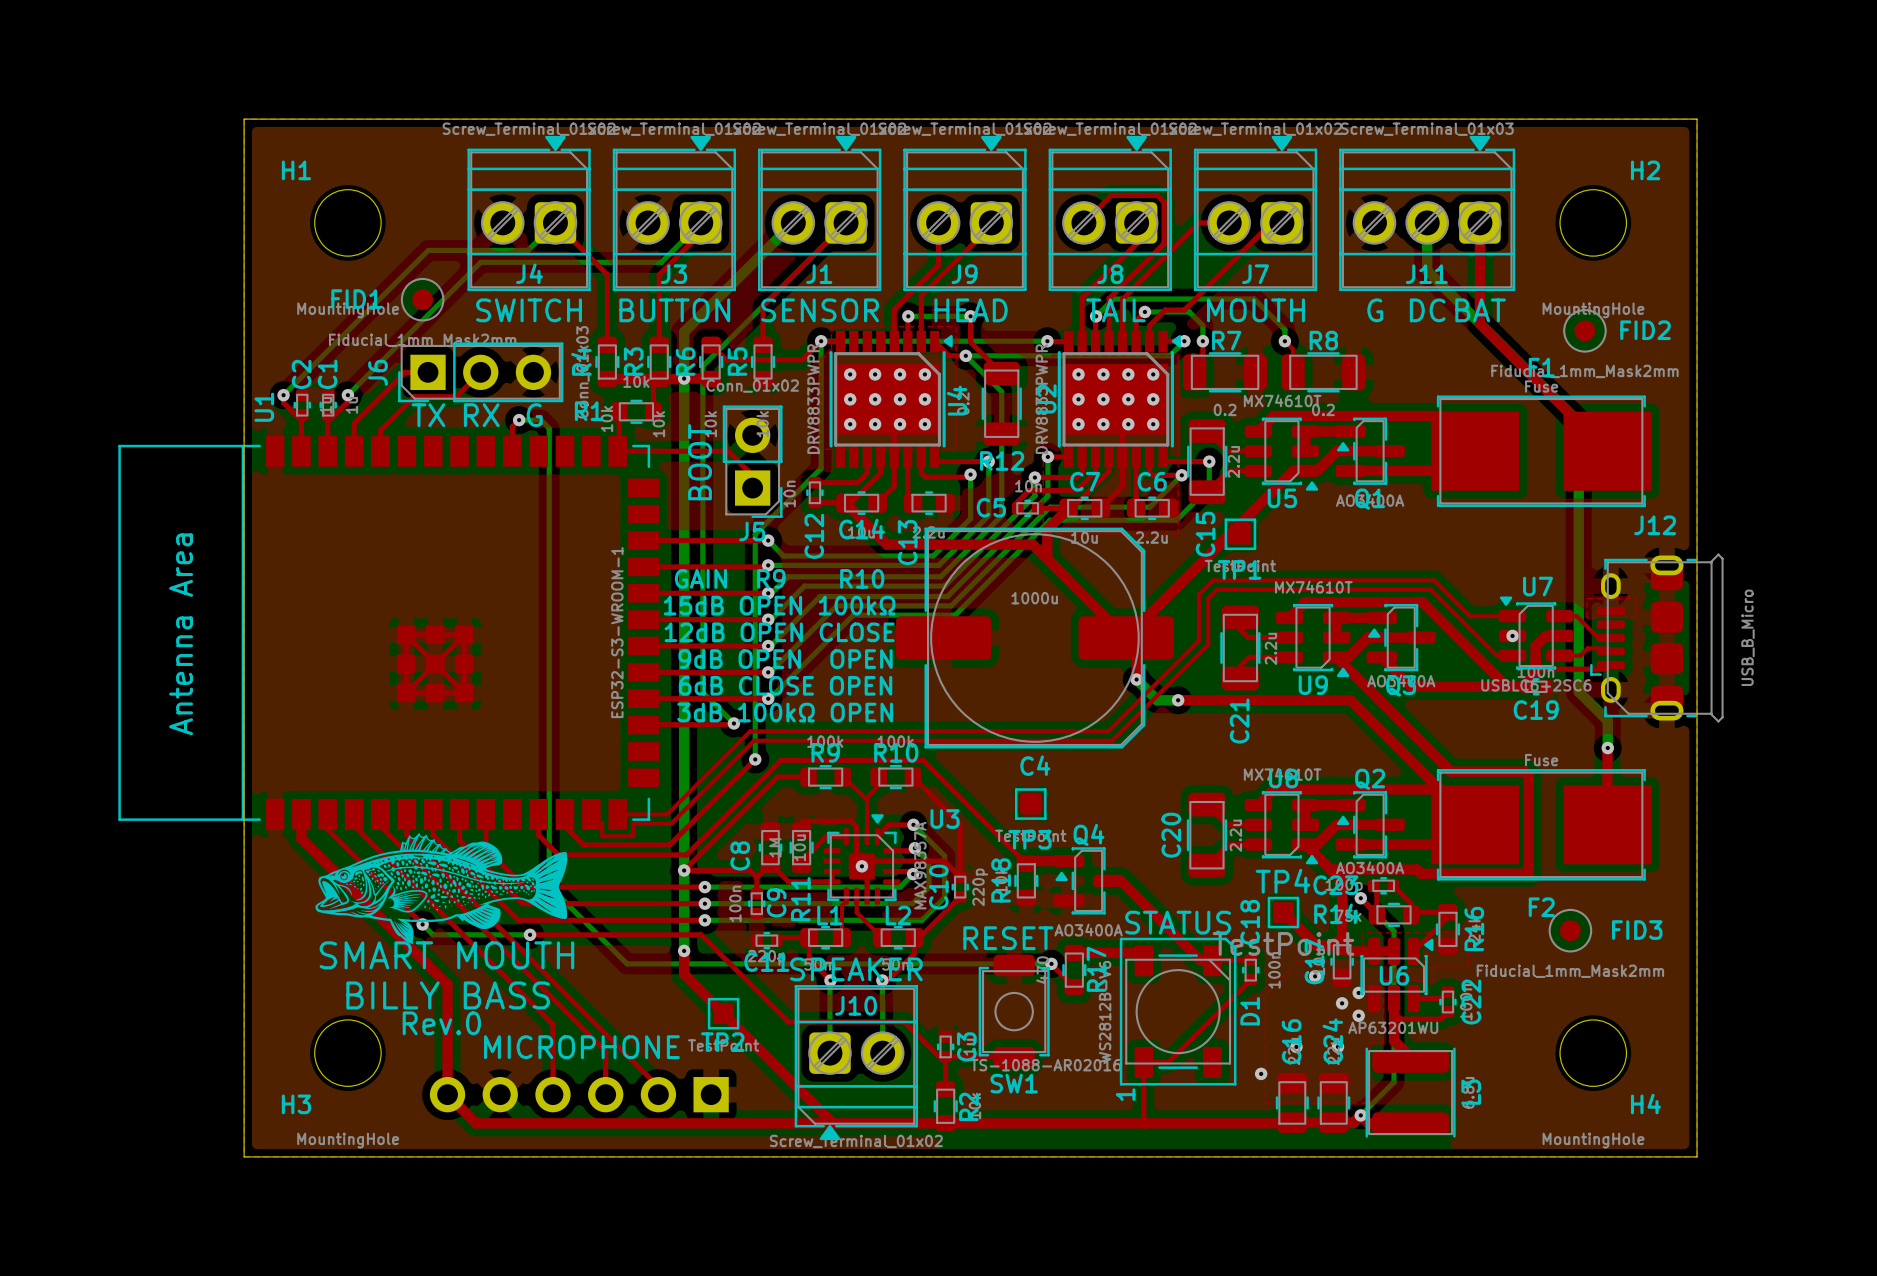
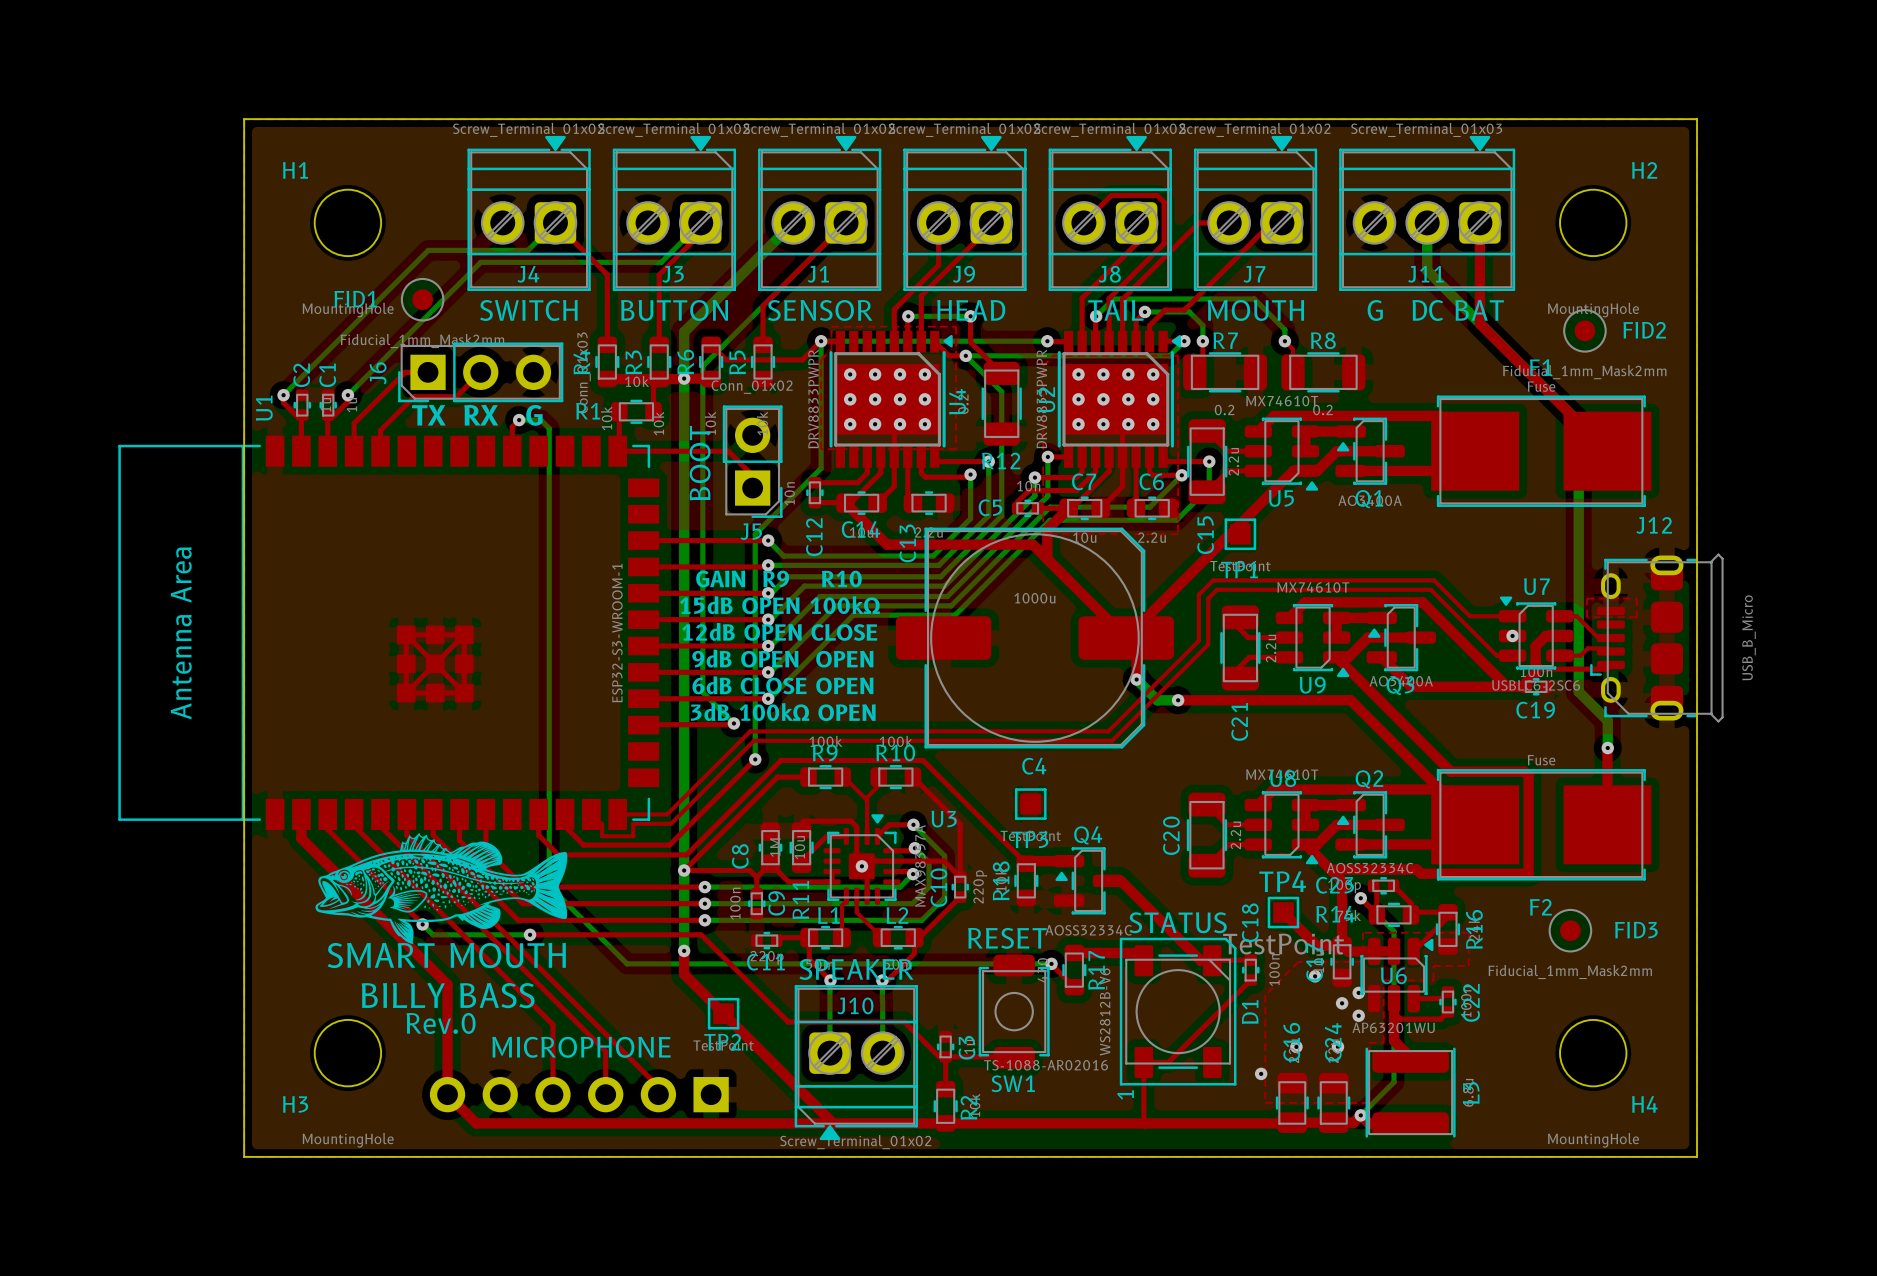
Q2 value: AO3400A (1370, 867) -> AOSS32334C (1370, 868)
Q4 value: AO3400A (1088, 930) -> AOSS32334C (1088, 930)

